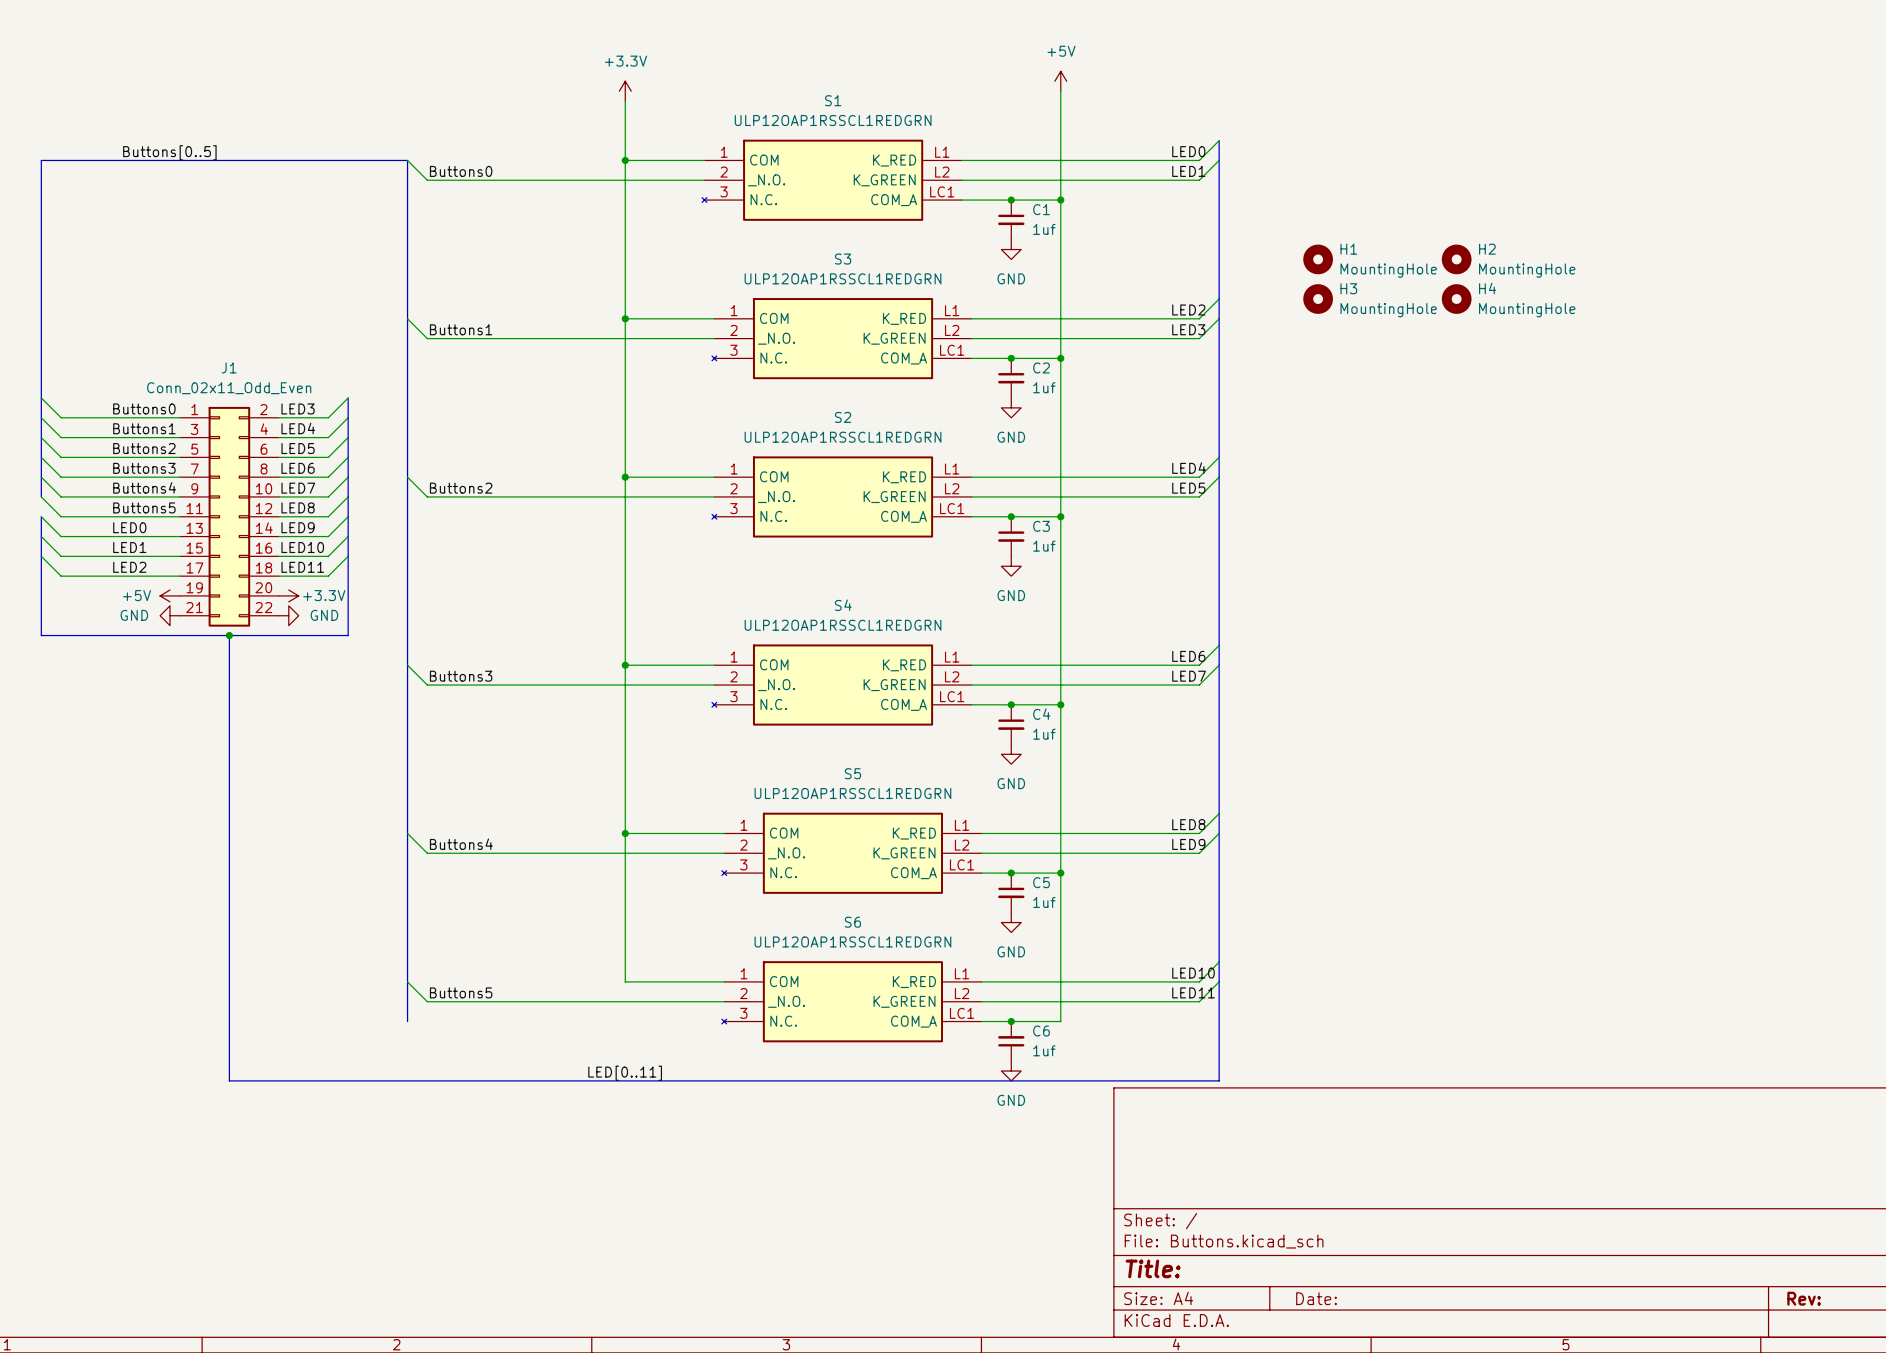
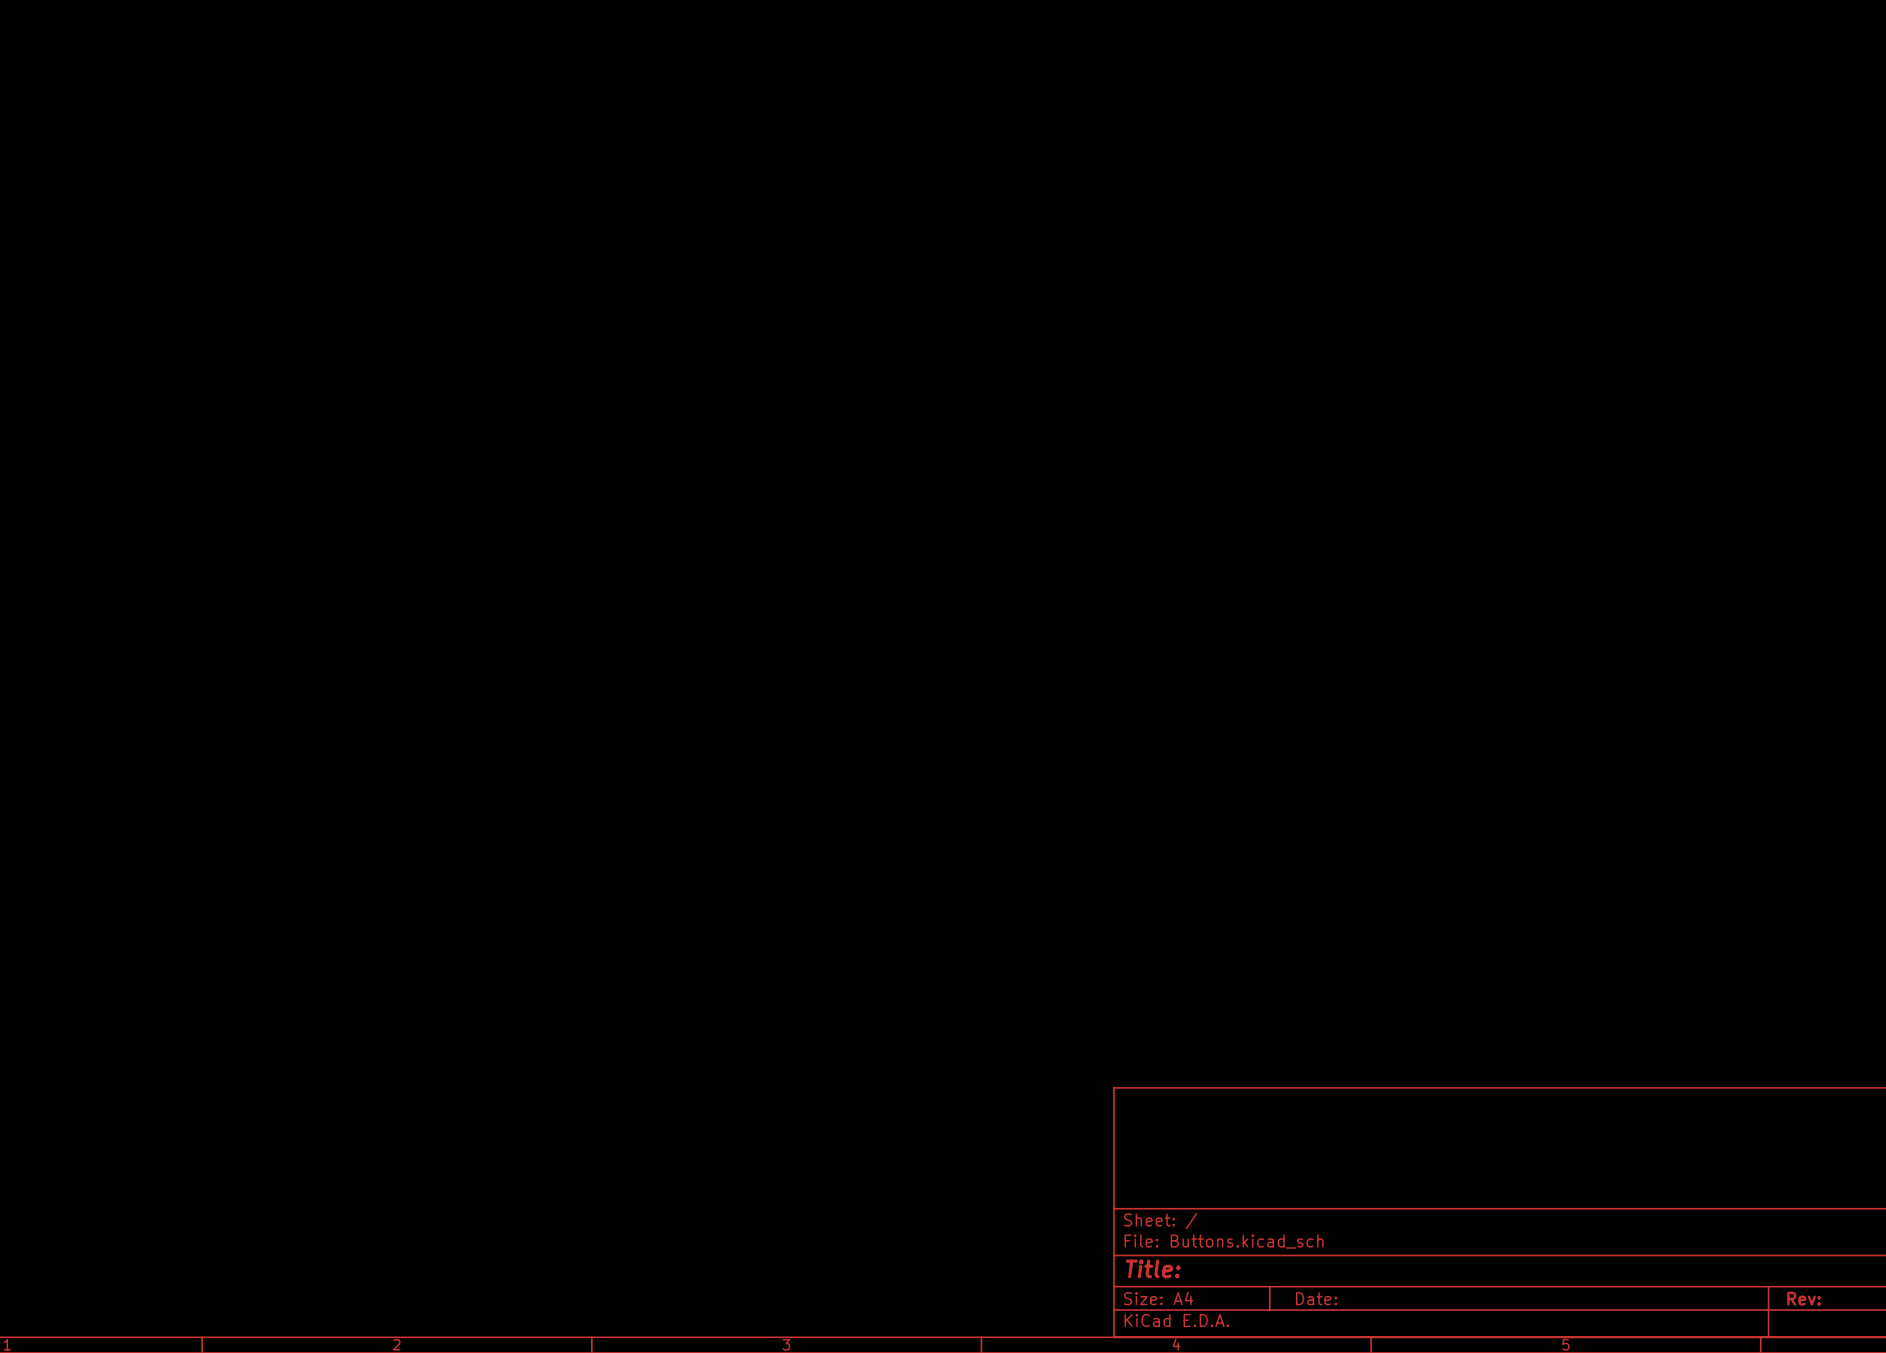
power symbol: +5V (1060, 81) -> none
power symbol: +3.3V (625, 91) -> none
wire: (1060, 91) (1060, 1021) (981, 1021) -> none
wire: (625, 101) (625, 981) (724, 981) -> none
wire: (1219, 140) (1199, 160) (961, 160) -> none
bus: (1219, 140) (1219, 1080) (229, 1080) (229, 635) -> none
label: LED0 (1188, 151) -> none
label: Buttons[0..5] (169, 152) -> none
wire: (407, 160) (427, 180) (704, 180) -> none
wire: (625, 160) (704, 160) -> none
junction: (625, 160) -> none
wire: (1219, 160) (1199, 180) (961, 180) -> none
label: Buttons0 (461, 171) -> none
label: LED1 (1188, 171) -> none
S1: ULP12OAP1RSSCL1REDGRN (831, 180) -> none
wire: (961, 200) (1060, 200) -> none
junction: (1011, 200) -> none
junction: (1060, 200) -> none
C1: 1uf (1011, 219) -> none
power symbol: GND (1011, 249) -> none
H1: MountingHole (1318, 259) -> none
H2: MountingHole (1456, 259) -> none
wire: (1219, 299) (1199, 318) (971, 318) -> none
H3: MountingHole (1318, 299) -> none
H4: MountingHole (1456, 299) -> none
label: LED2 (1188, 309) -> none
wire: (407, 318) (427, 338) (714, 338) -> none
wire: (625, 318) (714, 318) -> none
junction: (625, 318) -> none
wire: (1219, 318) (1199, 338) (971, 338) -> none
label: Buttons1 (461, 329) -> none
label: LED3 (1188, 329) -> none
S3: ULP12OAP1RSSCL1REDGRN (841, 338) -> none
wire: (971, 358) (1060, 358) -> none
junction: (1011, 358) -> none
junction: (1060, 358) -> none
C2: 1uf (1011, 378) -> none
wire: (41, 397) (61, 417) (179, 417) -> none
wire: (348, 397) (328, 417) (278, 417) -> none
bus: (348, 397) (348, 635) (41, 635) (41, 516) -> none
power symbol: GND (1011, 407) -> none
label: Buttons0 (144, 408) -> none
label: LED3 (298, 408) -> none
wire: (41, 417) (61, 437) (179, 437) -> none
wire: (348, 417) (328, 437) (278, 437) -> none
label: Buttons1 (144, 428) -> none
label: LED4 (298, 428) -> none
wire: (41, 437) (61, 457) (179, 457) -> none
wire: (348, 437) (328, 457) (278, 457) -> none
label: Buttons2 (144, 448) -> none
label: LED5 (298, 448) -> none
wire: (41, 457) (61, 477) (179, 477) -> none
wire: (348, 457) (328, 477) (278, 477) -> none
wire: (1219, 457) (1199, 477) (971, 477) -> none
label: Buttons3 (144, 468) -> none
label: LED6 (298, 468) -> none
label: LED4 (1189, 468) -> none
wire: (41, 477) (61, 496) (179, 496) -> none
wire: (348, 477) (328, 496) (278, 496) -> none
wire: (407, 477) (427, 496) (714, 496) -> none
wire: (625, 477) (714, 477) -> none
junction: (625, 477) -> none
wire: (1219, 477) (1199, 496) (971, 496) -> none
label: Buttons4 (144, 487) -> none
label: LED7 (298, 488) -> none
label: Buttons2 (461, 488) -> none
label: LED5 (1188, 488) -> none
wire: (41, 496) (61, 516) (179, 516) -> none
bus: (41, 496) (41, 160) (407, 160) (407, 1021) -> none
wire: (348, 496) (328, 516) (278, 516) -> none
S2: ULP12OAP1RSSCL1REDGRN (841, 496) -> none
label: Buttons5 (144, 507) -> none
label: LED8 (298, 507) -> none
wire: (41, 516) (61, 536) (179, 536) -> none
J1: Conn_02x11_Odd_Even (229, 516) -> none
wire: (348, 516) (328, 536) (278, 536) -> none
wire: (971, 516) (1060, 516) -> none
junction: (1011, 516) -> none
junction: (1060, 516) -> none
label: LED0 (129, 527) -> none
label: LED9 (298, 527) -> none
wire: (41, 536) (61, 556) (179, 556) -> none
wire: (348, 536) (328, 556) (278, 556) -> none
C3: 1uf (1011, 536) -> none
label: LED1 (129, 547) -> none
label: LED10 (302, 547) -> none
wire: (41, 556) (61, 576) (179, 576) -> none
wire: (348, 556) (328, 576) (278, 576) -> none
power symbol: GND (1011, 566) -> none
label: LED2 (129, 567) -> none
label: LED11 (302, 567) -> none
power symbol: +5V (170, 595) -> none
power symbol: +3.3V (288, 595) -> none
power symbol: GND (170, 615) -> none
power symbol: GND (288, 615) -> none
junction: (229, 635) -> none
wire: (1219, 645) (1199, 665) (971, 665) -> none
label: LED6 (1188, 656) -> none
wire: (407, 665) (427, 685) (714, 685) -> none
wire: (625, 665) (714, 665) -> none
junction: (625, 665) -> none
wire: (1219, 665) (1199, 685) (971, 685) -> none
label: Buttons3 (461, 676) -> none
label: LED7 (1189, 676) -> none
S4: ULP12OAP1RSSCL1REDGRN (841, 685) -> none
wire: (971, 704) (1060, 704) -> none
junction: (1011, 704) -> none
junction: (1060, 704) -> none
C4: 1uf (1011, 724) -> none
power symbol: GND (1011, 754) -> none
wire: (1219, 813) (1199, 833) (981, 833) -> none
label: LED8 (1188, 824) -> none
wire: (407, 833) (427, 853) (724, 853) -> none
wire: (625, 833) (724, 833) -> none
junction: (625, 833) -> none
wire: (1219, 833) (1199, 853) (981, 853) -> none
label: Buttons4 (461, 844) -> none
label: LED9 (1188, 844) -> none
S5: ULP12OAP1RSSCL1REDGRN (851, 853) -> none
wire: (981, 873) (1060, 873) -> none
junction: (1011, 873) -> none
junction: (1060, 873) -> none
C5: 1uf (1011, 892) -> none
power symbol: GND (1011, 922) -> none
wire: (1219, 962) (1199, 981) (981, 981) -> none
label: LED10 (1193, 973) -> none
wire: (407, 981) (427, 1001) (724, 1001) -> none
wire: (1219, 981) (1199, 1001) (981, 1001) -> none
label: Buttons5 (461, 992) -> none
label: LED11 (1193, 992) -> none
S6: ULP12OAP1RSSCL1REDGRN (851, 1001) -> none
junction: (1011, 1021) -> none
C6: 1uf (1011, 1041) -> none
power symbol: GND (1011, 1071) -> none
label: LED[0..11] (625, 1073) -> none

